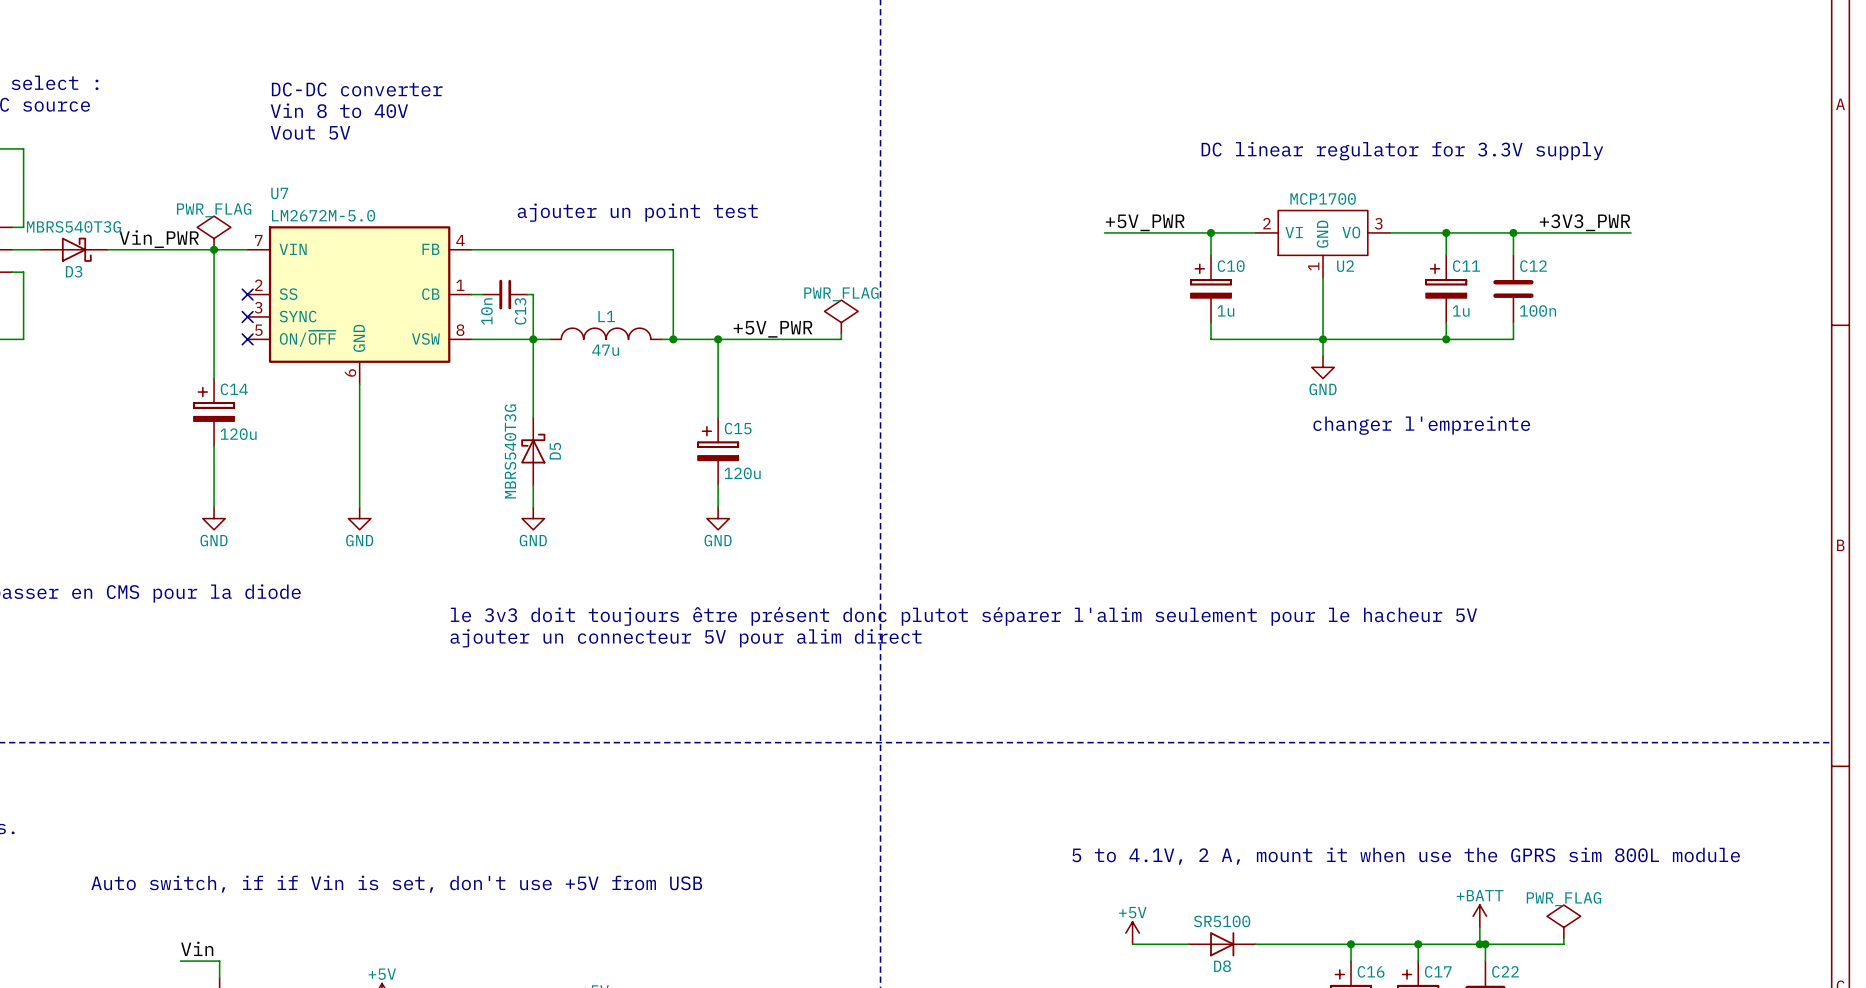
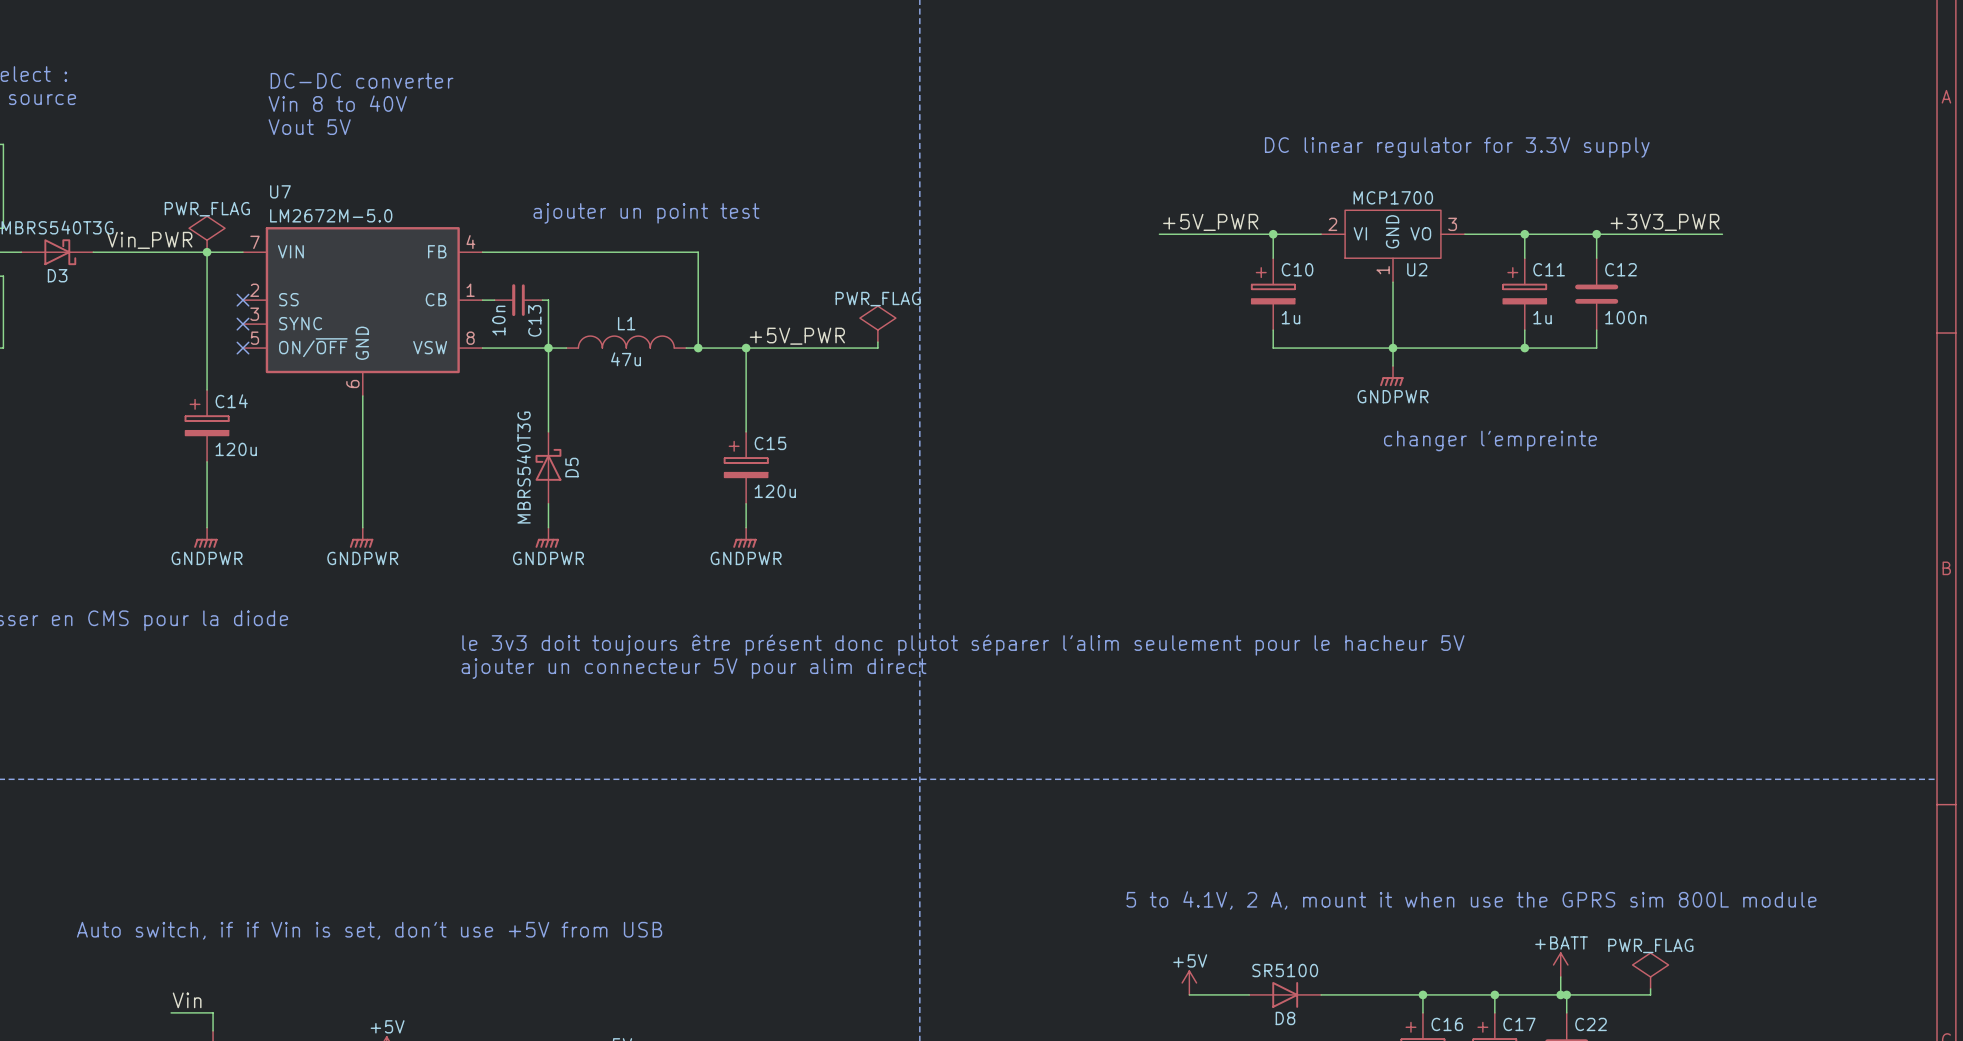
power symbol: GND (1323, 367) -> GNDPWR (1391, 376)
power symbol: GND (214, 518) -> GNDPWR (205, 537)
power symbol: GND (359, 518) -> GNDPWR (361, 537)
power symbol: GND (533, 518) -> GNDPWR (547, 537)
power symbol: GND (718, 518) -> GNDPWR (744, 537)

